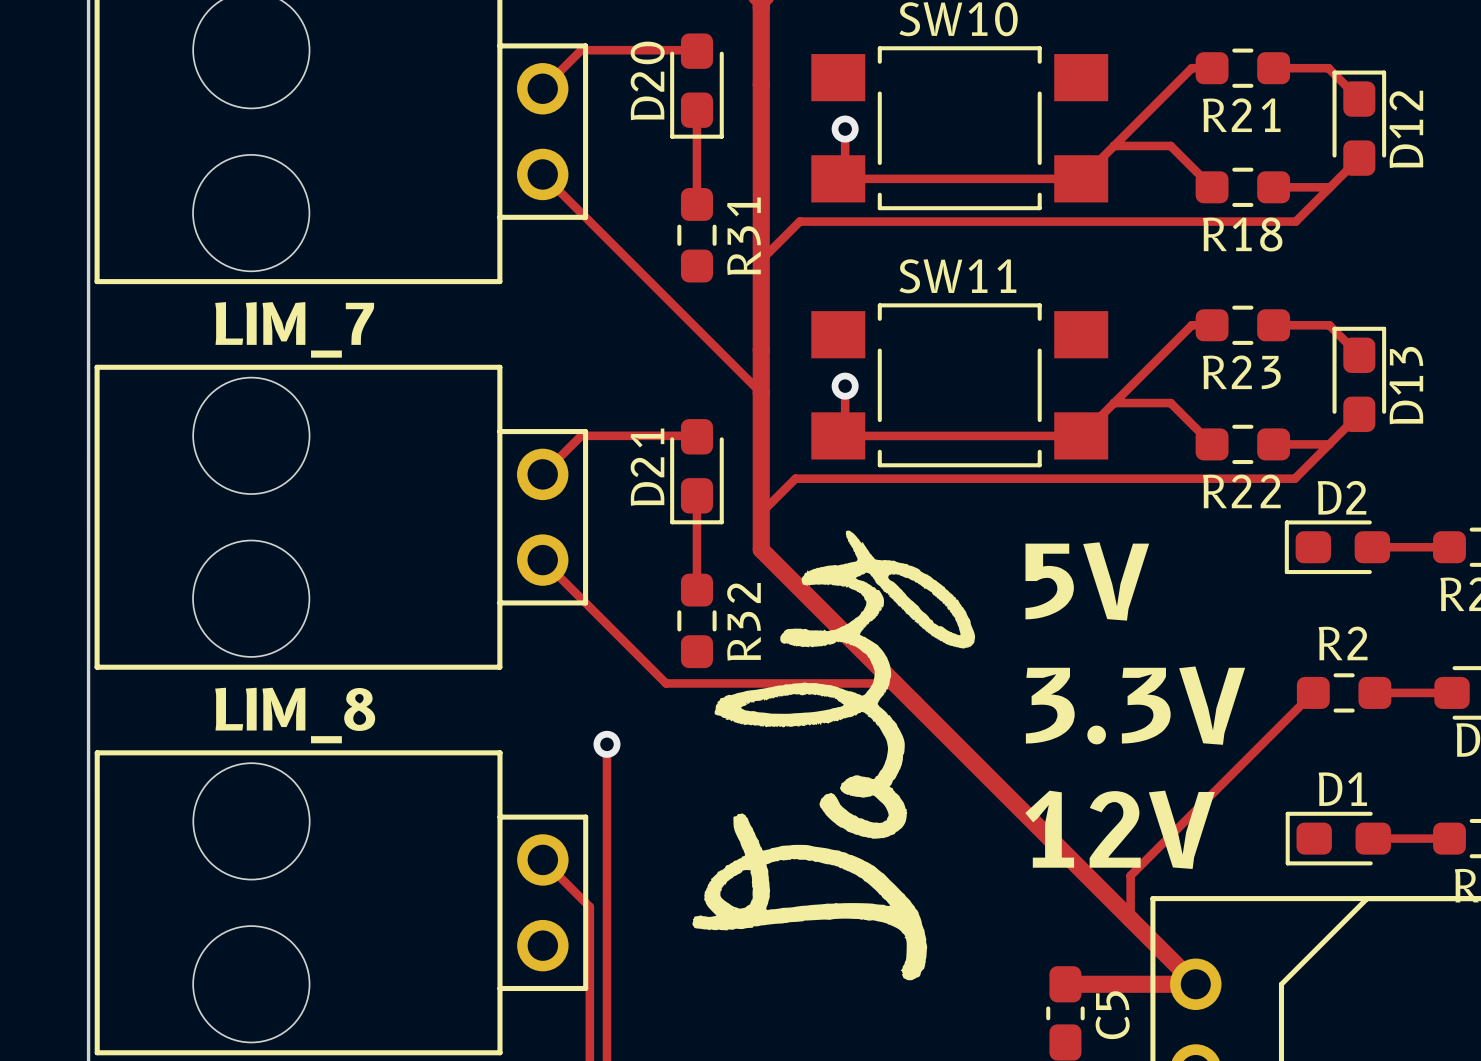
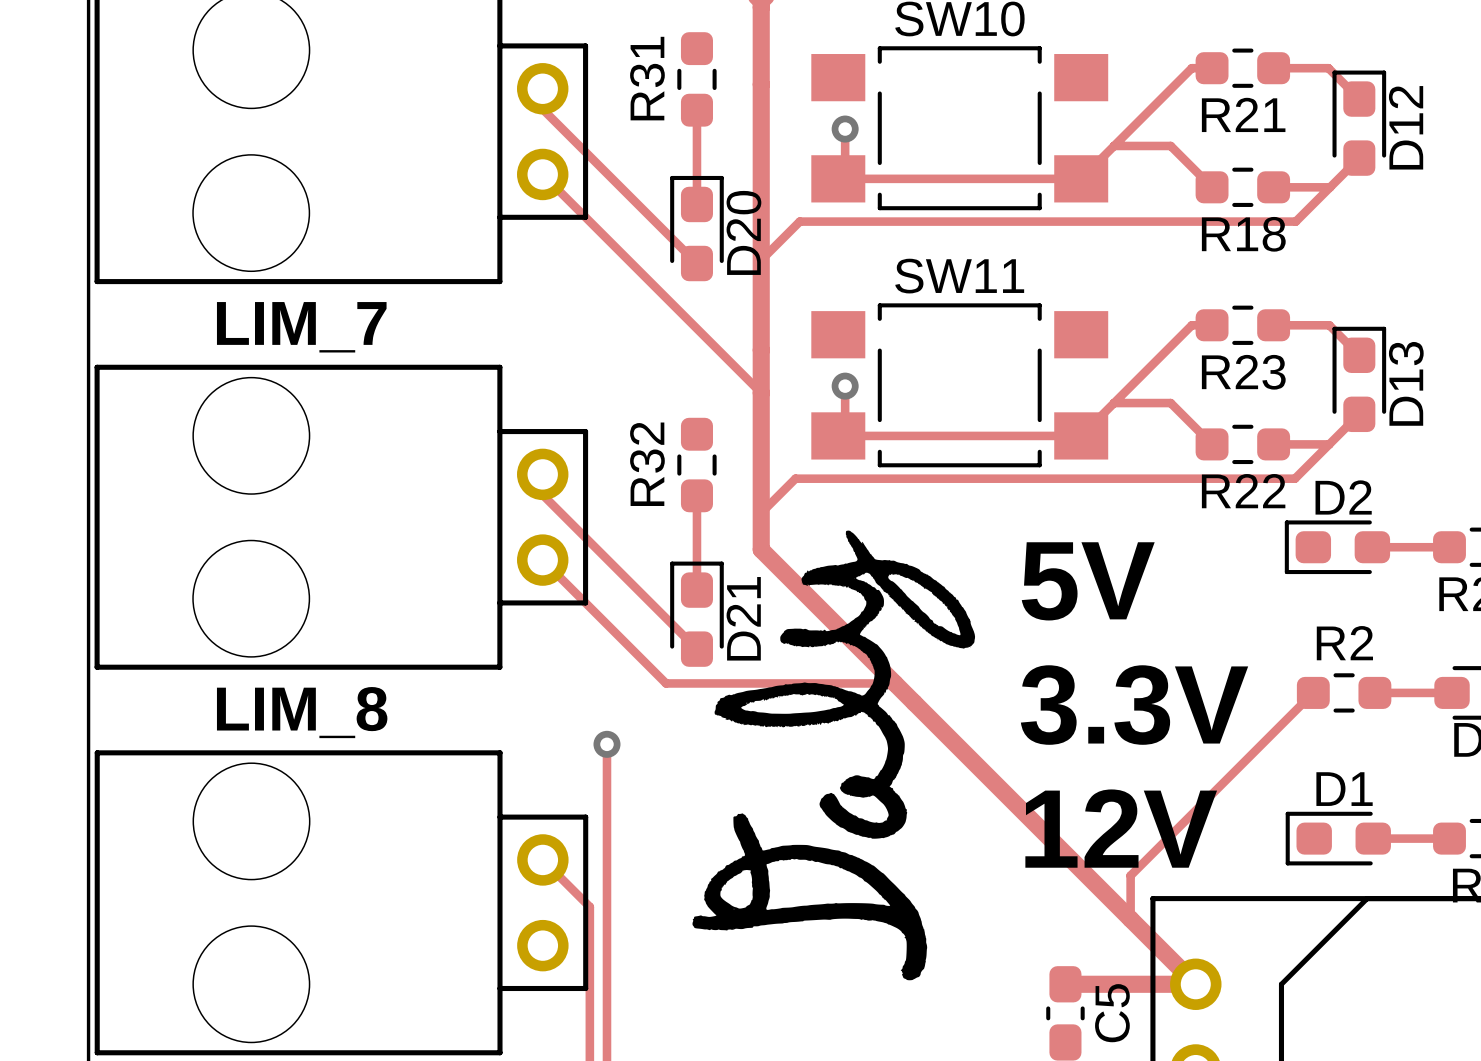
track: (696, 50) (581, 50) (542, 88) -> (696, 263) (542, 109) (542, 88)
D20 rotation: 0° (696, 86) -> 180° (696, 228)
D20 position: (696, 86) -> (696, 228)
R31 position: (696, 235) -> (696, 79)
R31 name position: R31 (743, 236) -> R31 (647, 78)
track: (696, 435) (581, 435) (542, 474) -> (696, 649) (542, 494) (542, 474)
D21 rotation: 0° (696, 471) -> 180° (696, 614)
D21 position: (696, 471) -> (696, 614)
R32 position: (696, 620) -> (696, 465)
R32 name position: R32 (743, 621) -> R32 (647, 464)

